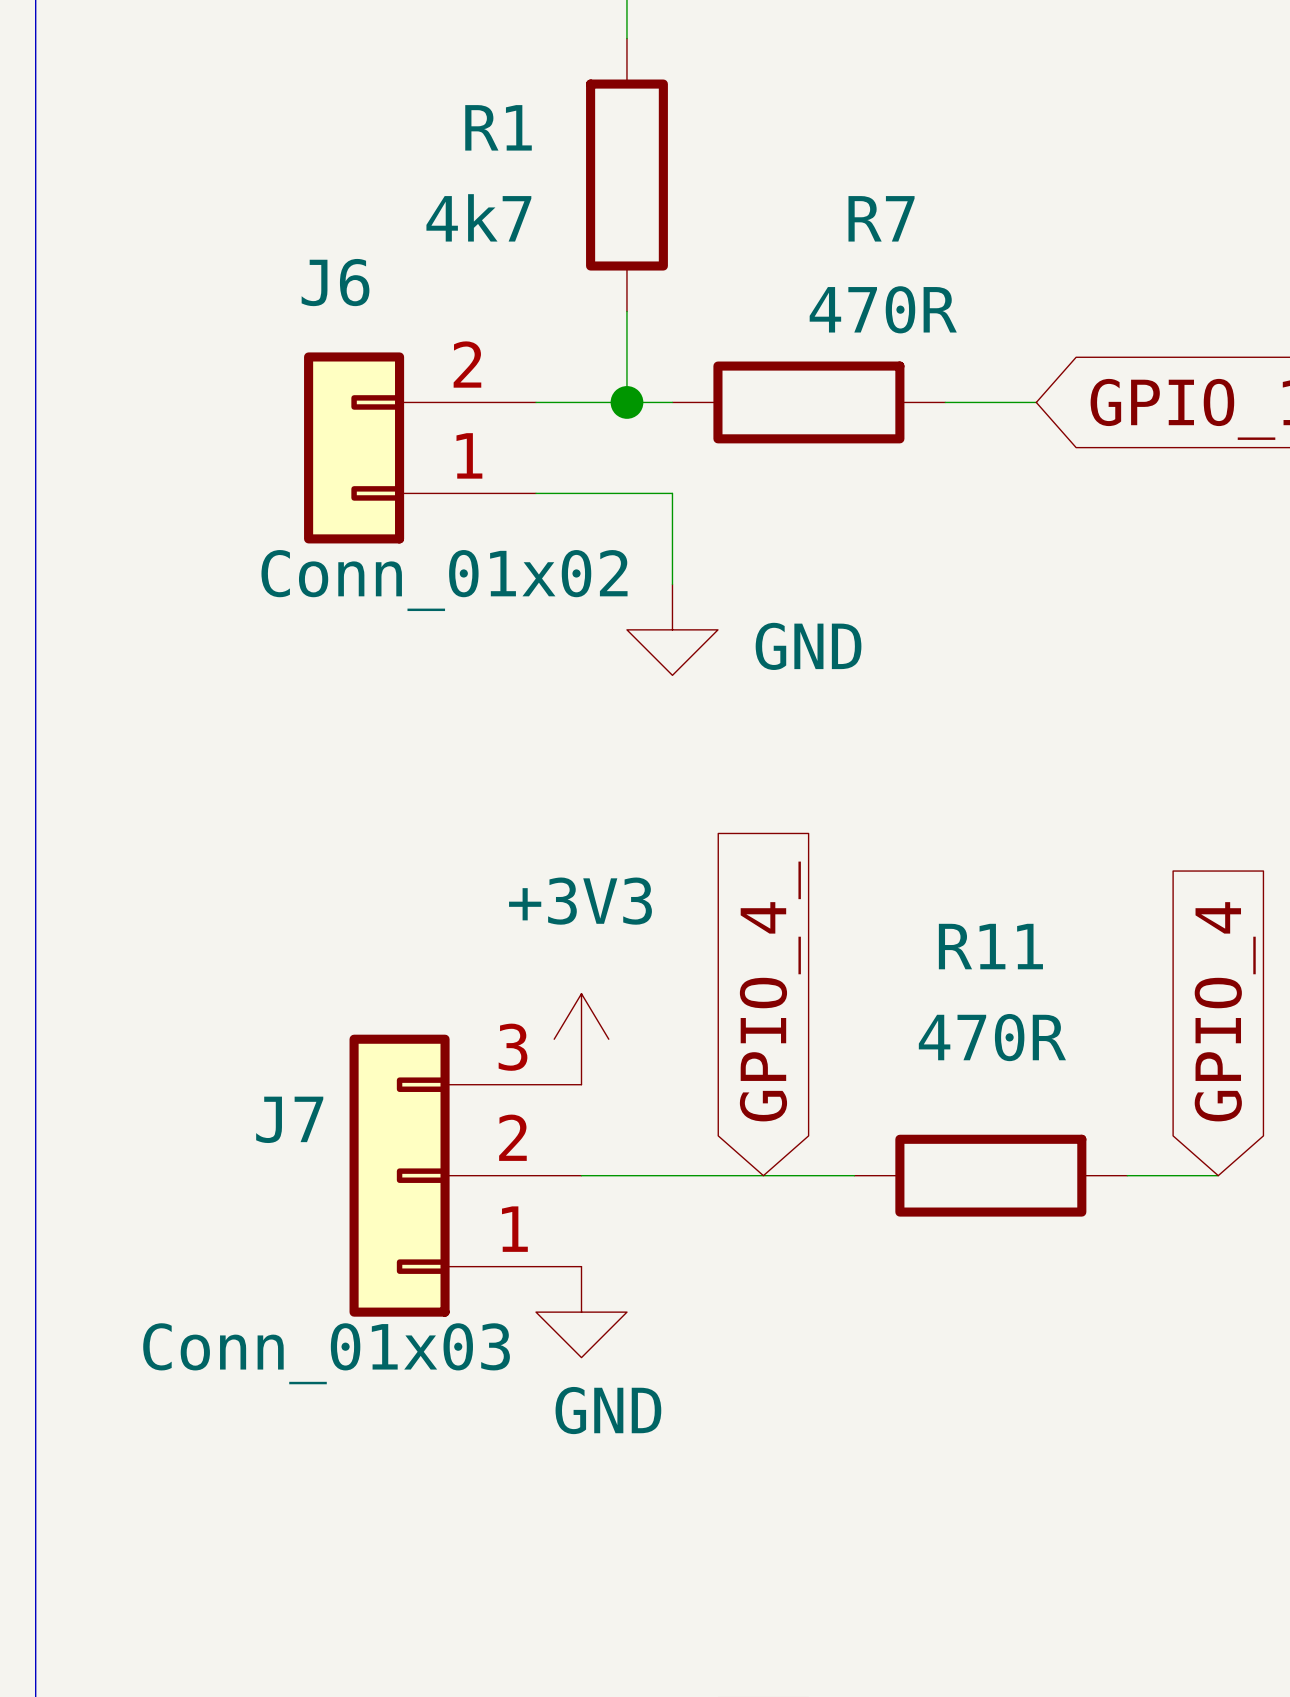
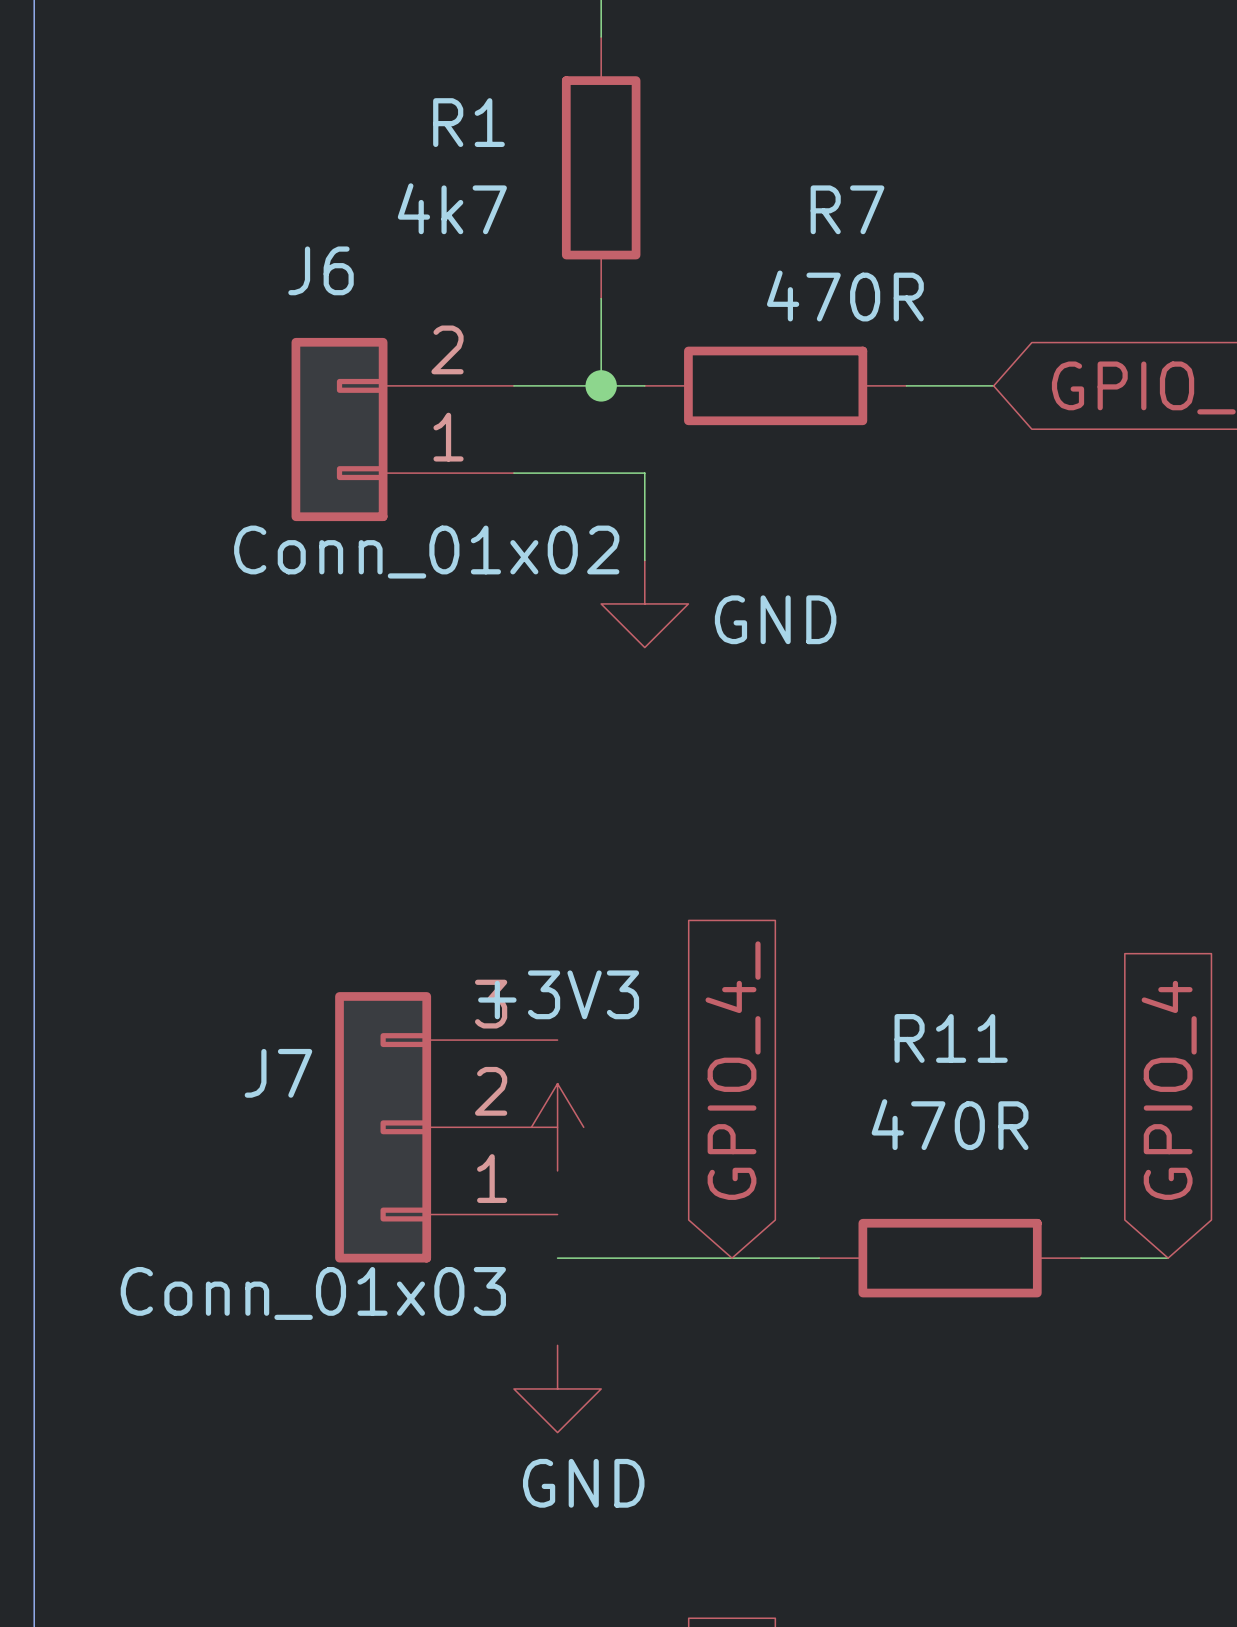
global label position: GPIO_4_ (770, 991) -> GPIO_4_ (733, 1070)
global label position: GPIO_4 (1225, 1011) -> GPIO_4 (1169, 1090)
power symbol position: +3V3 (581, 1039) -> +3V3 (557, 1127)
wire: (581, 1175) (854, 1175) -> (557, 1258) (819, 1258)
R11 position: (990, 1175) -> (950, 1258)
wire: (1127, 1175) (1218, 1175) -> (1080, 1258) (1168, 1258)
power symbol position: GND (581, 1312) -> GND (557, 1388)

